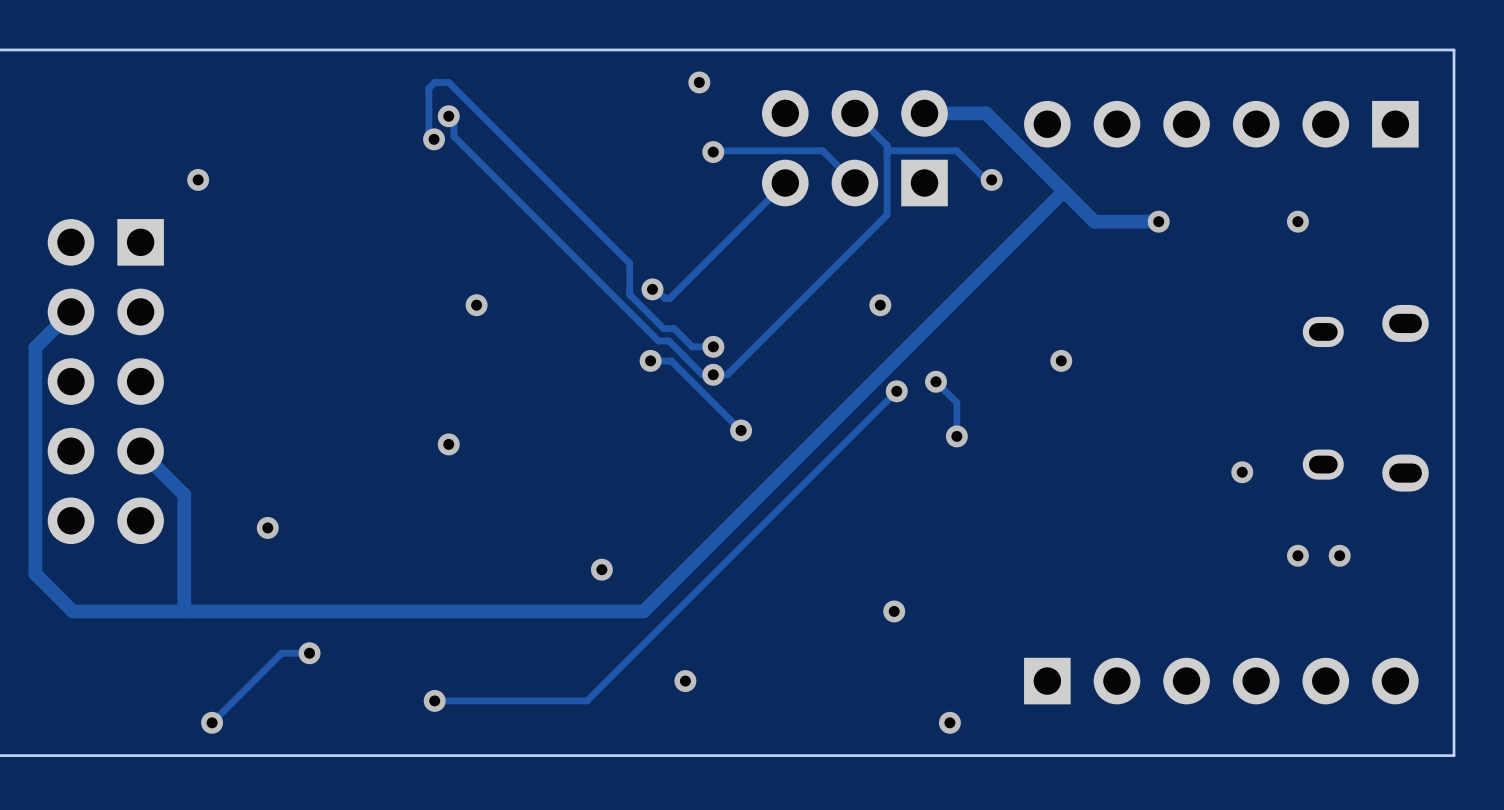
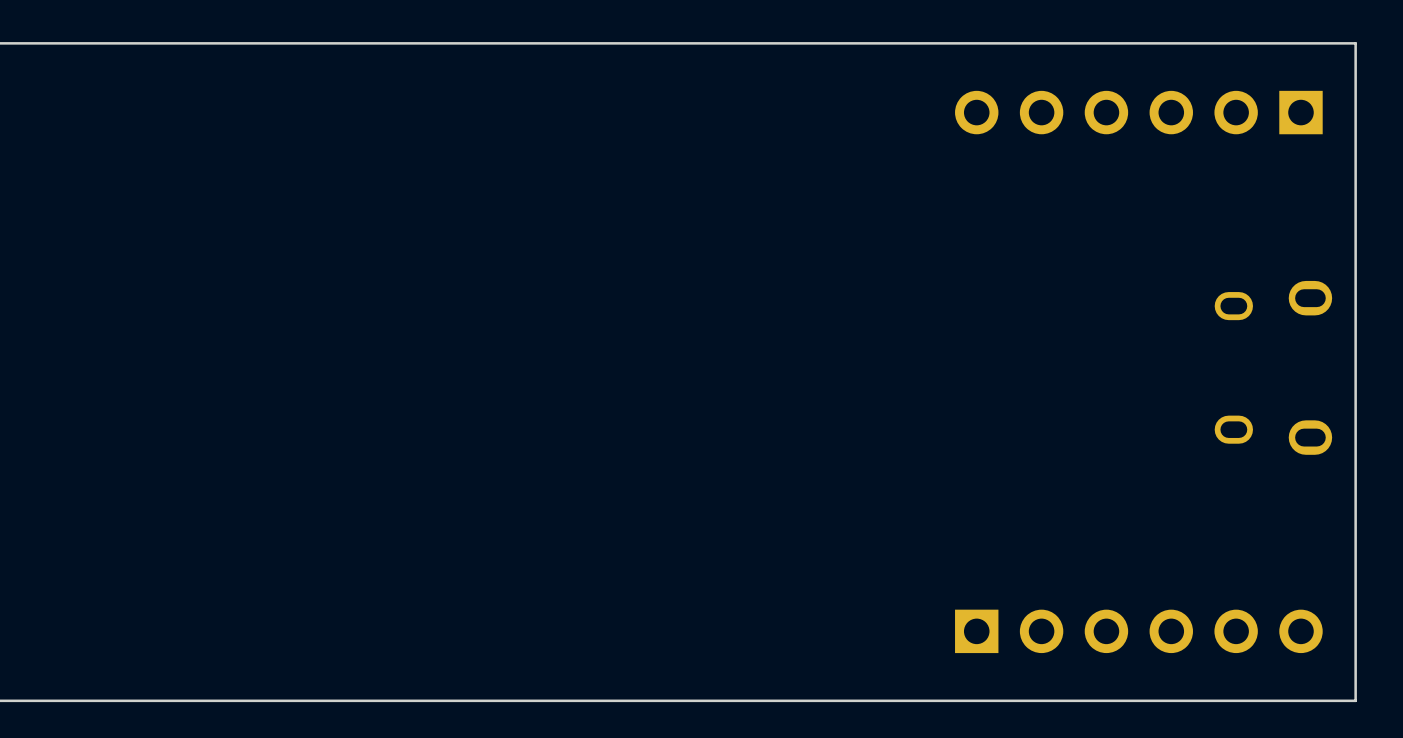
via: (699, 82) -> none
track: (854, 113) (887, 145) (887, 214) (727, 374) (702, 374) (669, 341) (658, 341) (453, 136) (453, 121) (448, 116) -> none
track: (924, 113) (986, 113) (1094, 221) (1158, 221) -> none
via: (448, 116) -> none
track: (434, 139) (428, 134) (428, 88) (434, 82) (448, 82) (629, 263) (629, 294) (663, 328) (674, 328) (692, 346) (713, 346) -> none
via: (434, 139) -> none
part: (854, 148) -> none
track: (713, 152) (822, 150) (854, 183) -> none
via: (713, 152) -> none
track: (887, 152) (956, 150) (985, 179) (991, 179) -> none
via: (198, 179) -> none
via: (991, 179) -> none
track: (785, 183) (670, 298) (664, 298) (655, 289) (652, 289) -> none
track: (1063, 191) (643, 611) (72, 611) (35, 573) (35, 347) (71, 311) -> none
via: (1158, 221) -> none
via: (1297, 221) -> none
via: (652, 289) -> none
via: (476, 305) -> none
via: (880, 305) -> none
via: (713, 346) -> none
via: (650, 360) -> none
via: (1061, 360) -> none
track: (650, 361) (671, 361) (740, 430) -> none
via: (713, 374) -> none
part: (105, 381) -> none
track: (935, 381) (956, 402) (956, 436) -> none
via: (935, 381) -> none
track: (896, 391) (587, 700) (434, 700) -> none
via: (896, 391) -> none
via: (741, 430) -> none
via: (956, 436) -> none
via: (448, 444) -> none
track: (140, 451) (184, 494) (184, 611) -> none
via: (1242, 472) -> none
via: (267, 527) -> none
via: (1297, 555) -> none
via: (1339, 555) -> none
via: (601, 569) -> none
via: (894, 611) -> none
track: (309, 653) (281, 653) (212, 722) -> none
via: (309, 653) -> none
via: (685, 681) -> none
via: (434, 700) -> none
via: (212, 722) -> none
via: (949, 722) -> none

